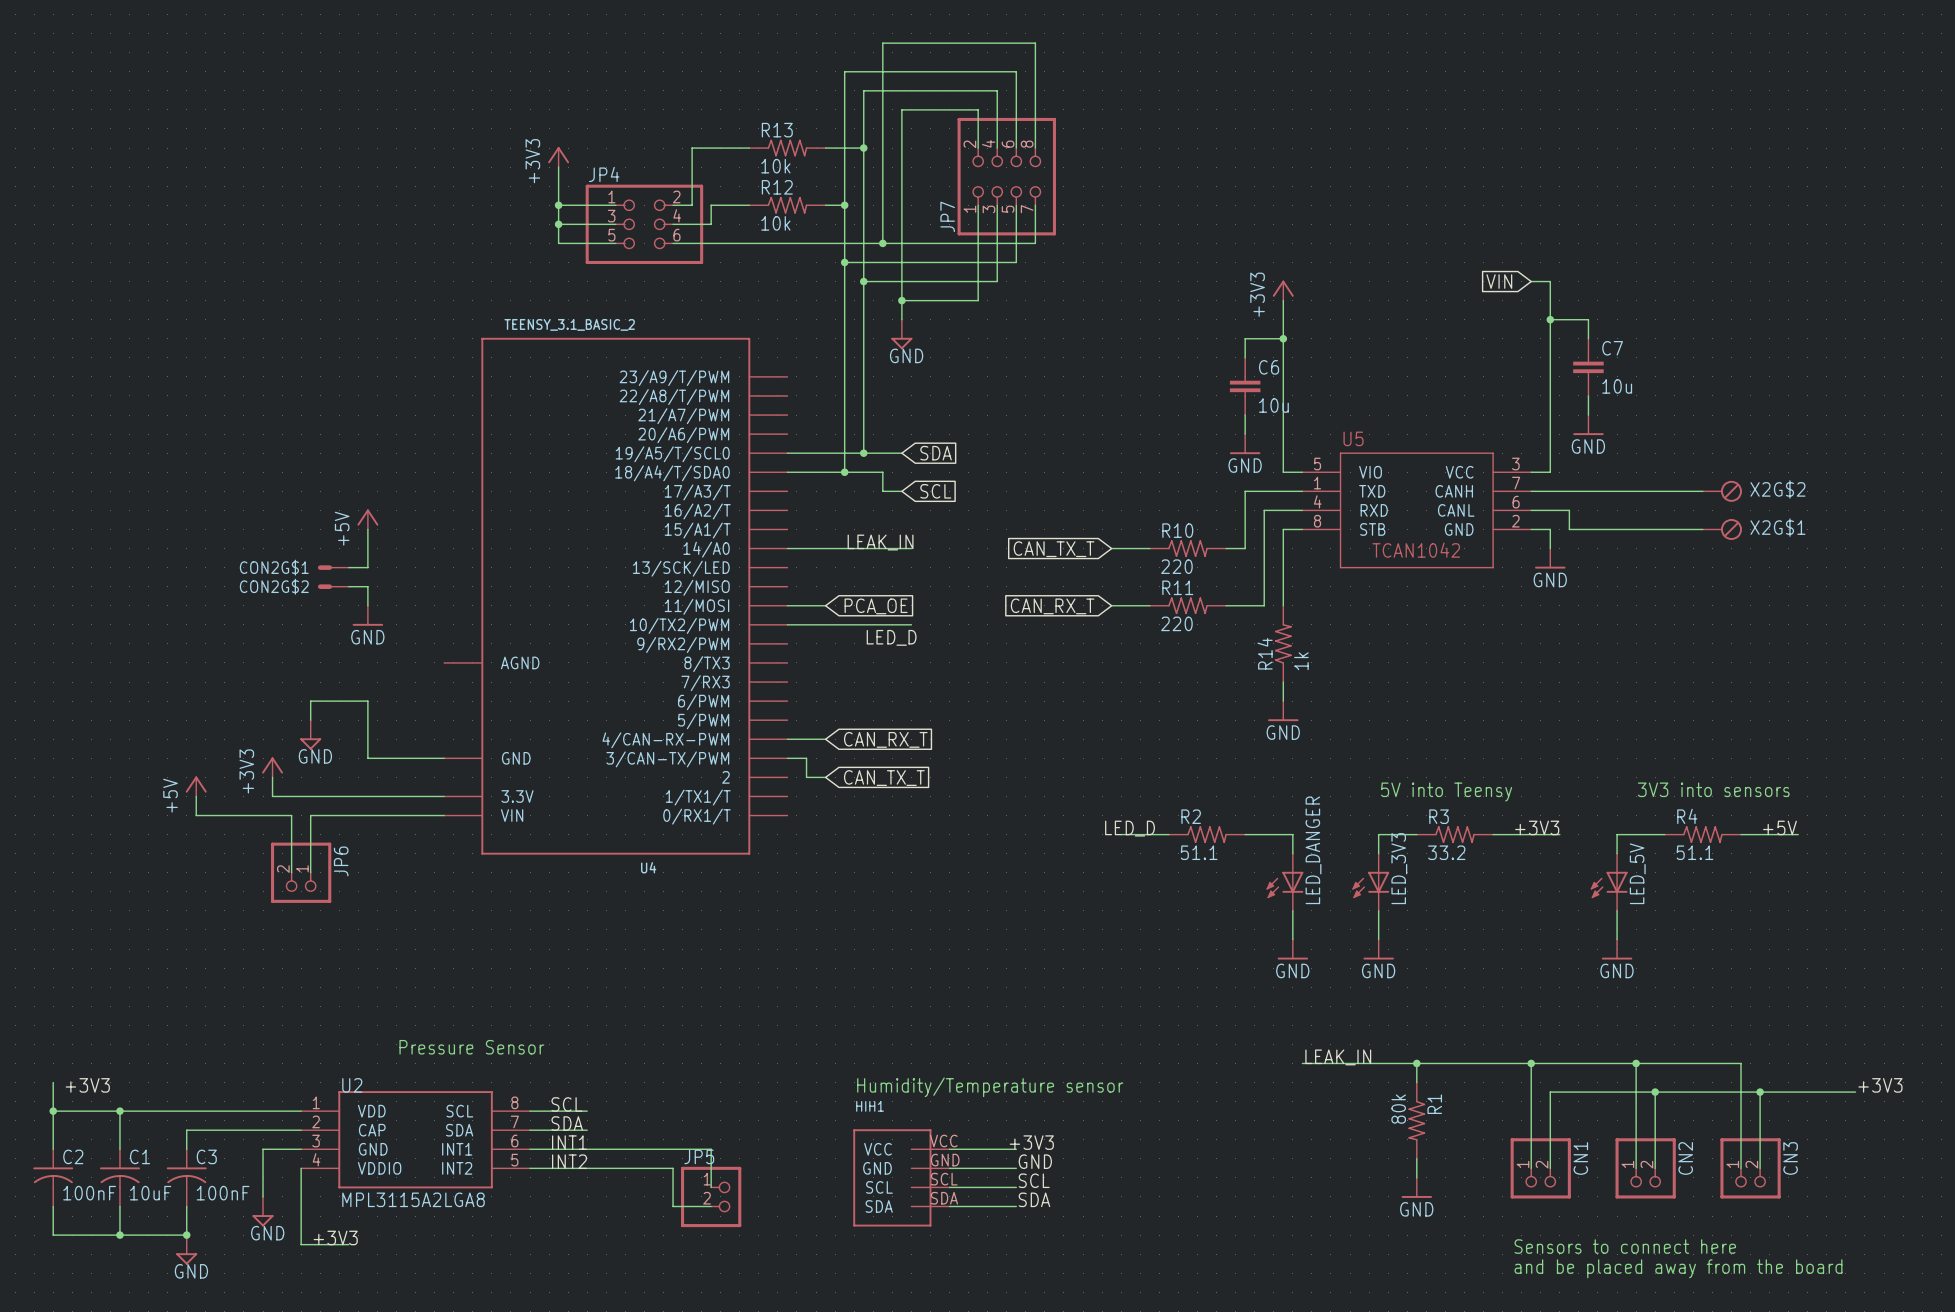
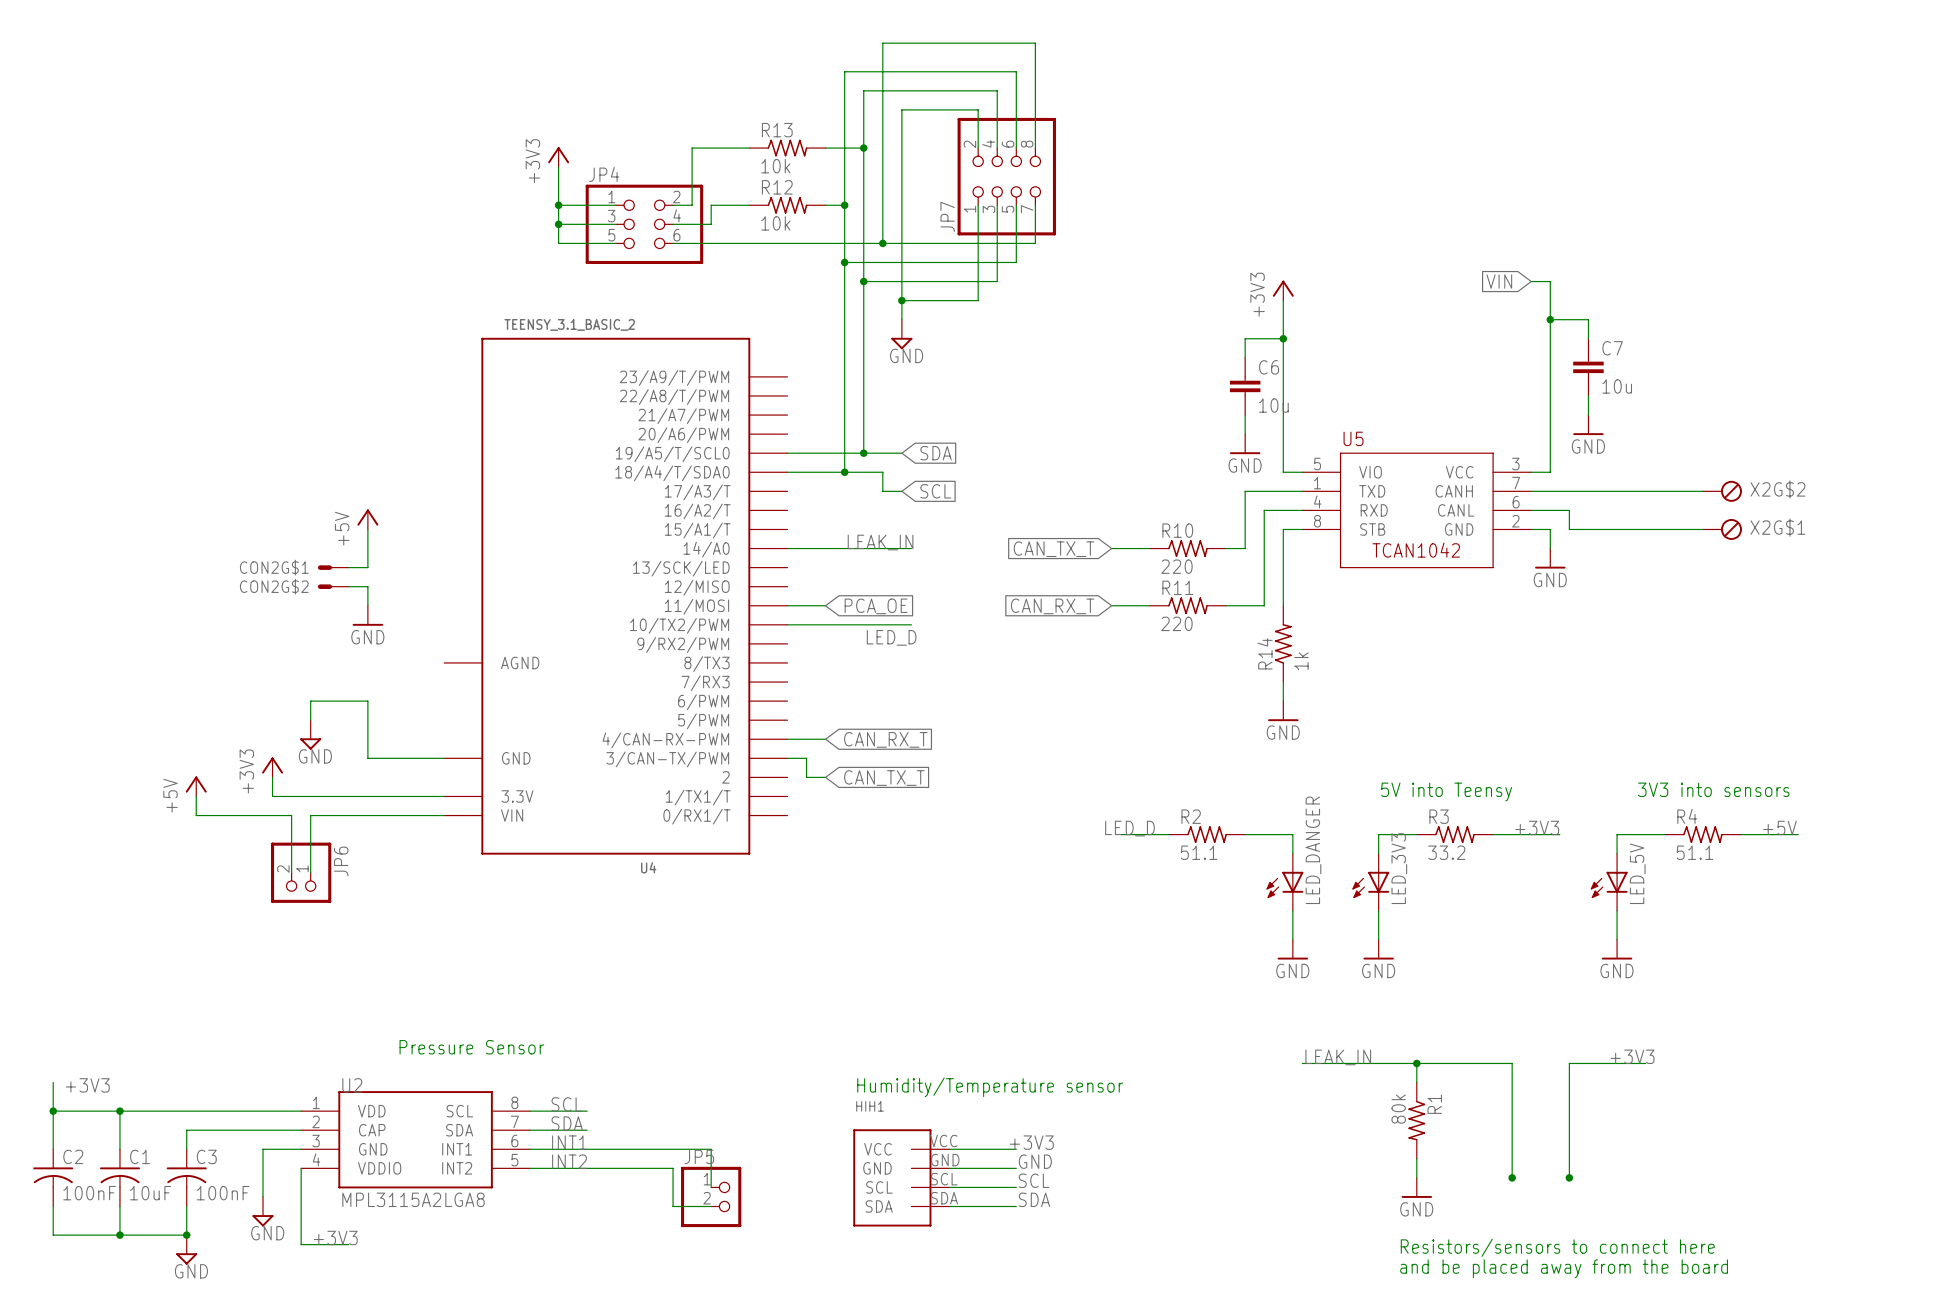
label: none -> +3V3 (1632, 1056)
wire: (1512, 1063) (1569, 1063) -> (1512, 1063) (1512, 1177)
wire: (1531, 1063) (1531, 1168) -> none
junction: (1531, 1063) -> none
wire: none -> (1569, 1063) (1569, 1177)
wire: (1636, 1063) (1636, 1168) -> none
junction: (1636, 1063) -> none
wire: (1645, 1063) (1741, 1063) (1741, 1168) -> none
label: +3V3 (1880, 1085) -> none
wire: (1655, 1092) (1655, 1168) -> none
junction: (1655, 1092) -> none
wire: (1760, 1092) (1760, 1168) -> none
junction: (1760, 1092) -> none
wire: (1855, 1092) (1550, 1092) (1550, 1168) -> none
CN1: (1540, 1168) -> none
CN2: (1645, 1168) -> none
CN3: (1750, 1168) -> none
junction: none -> (1512, 1177)
junction: none -> (1569, 1177)
text: Sensors to connect here (1625, 1246) -> Resistors/sensors to connect here (1557, 1247)
text position: and be placed away from the board (1678, 1268) -> and be placed away from the board (1564, 1268)

